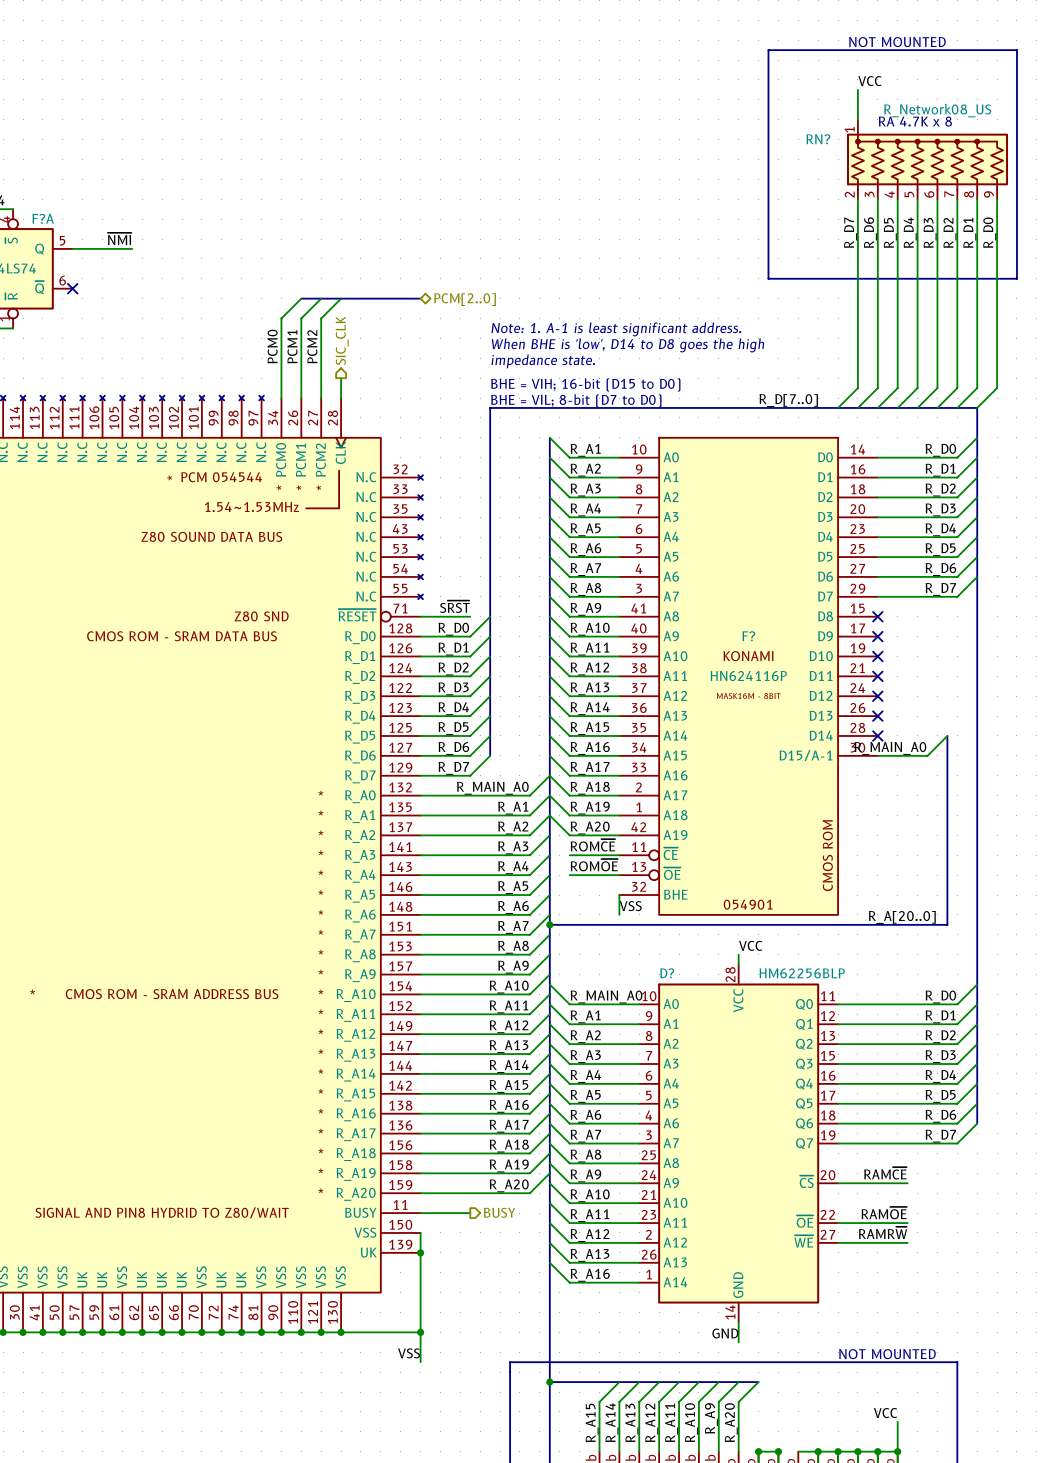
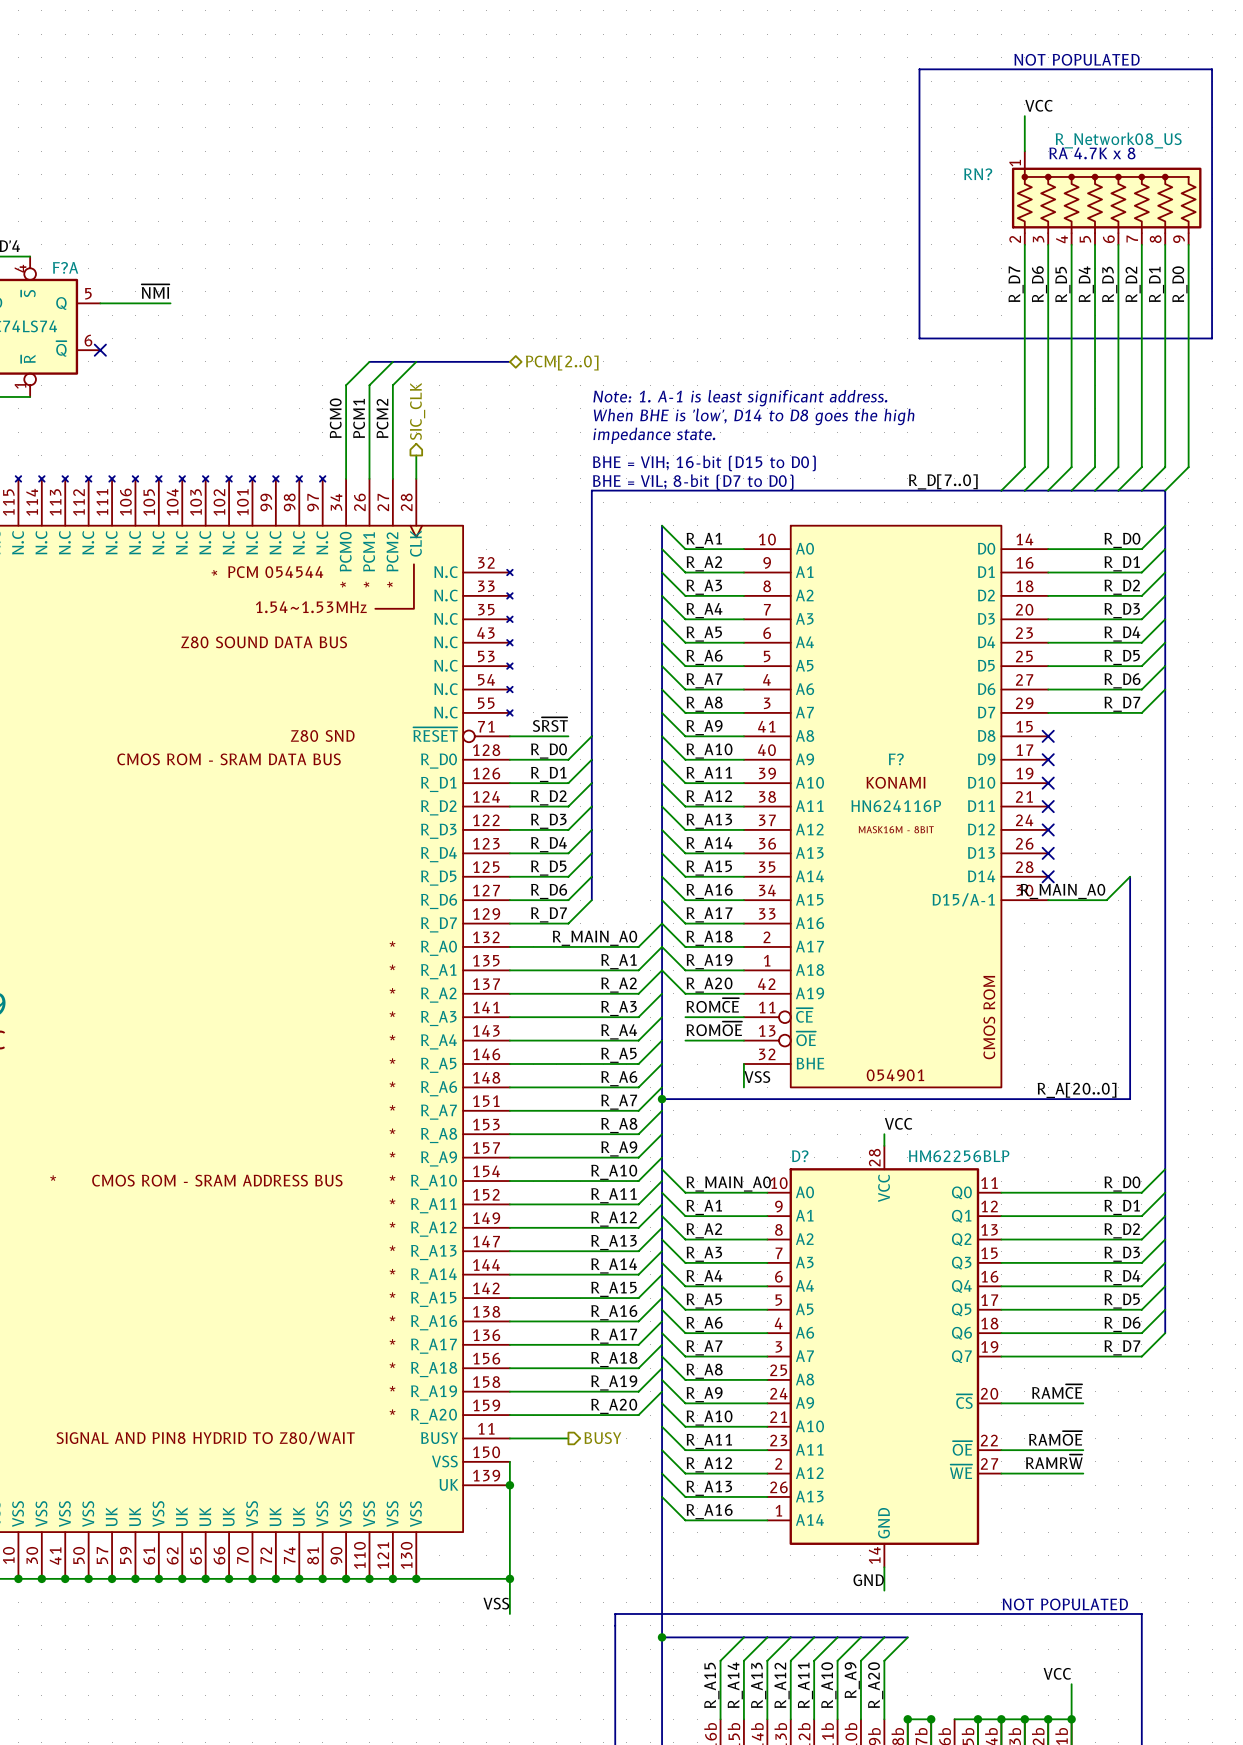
text: NOT MOUNTED (897, 42) -> NOT POPULATED (1077, 59)
text: NOT MOUNTED (887, 1354) -> NOT POPULATED (1065, 1604)

